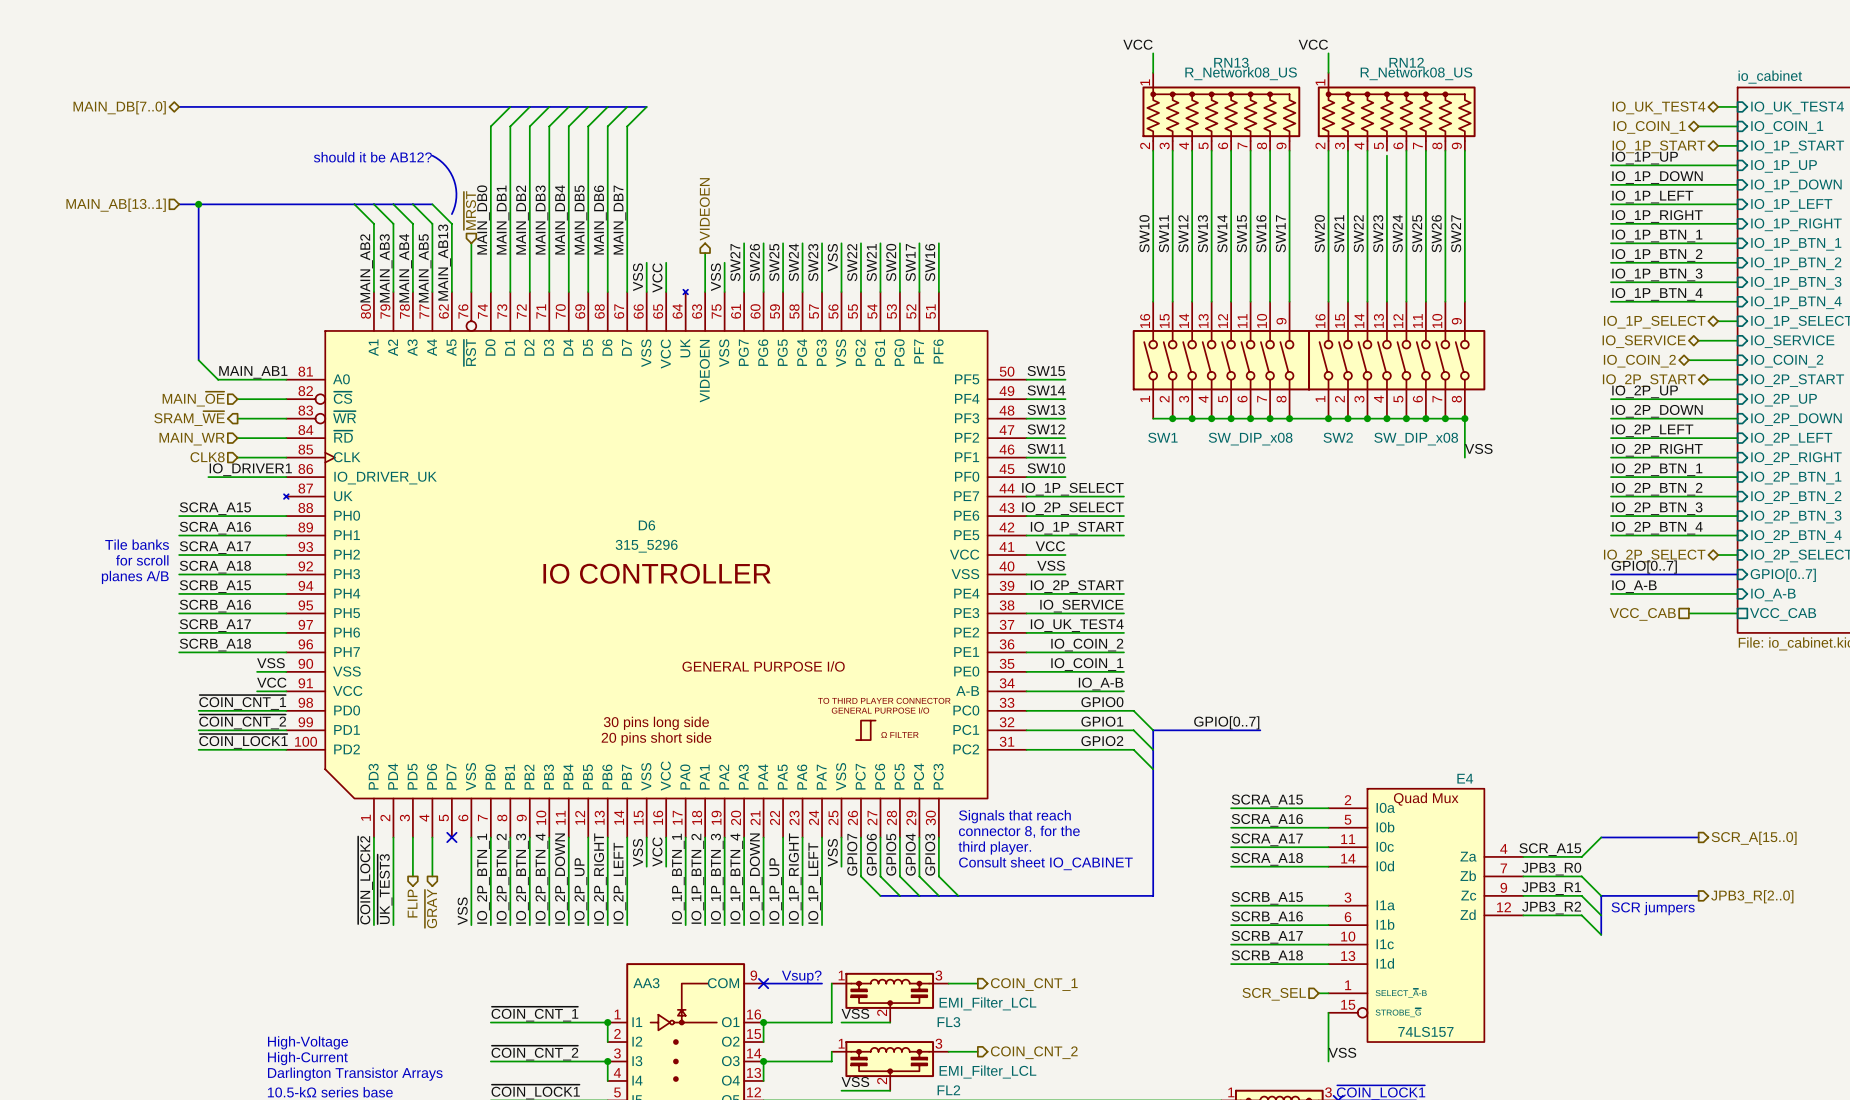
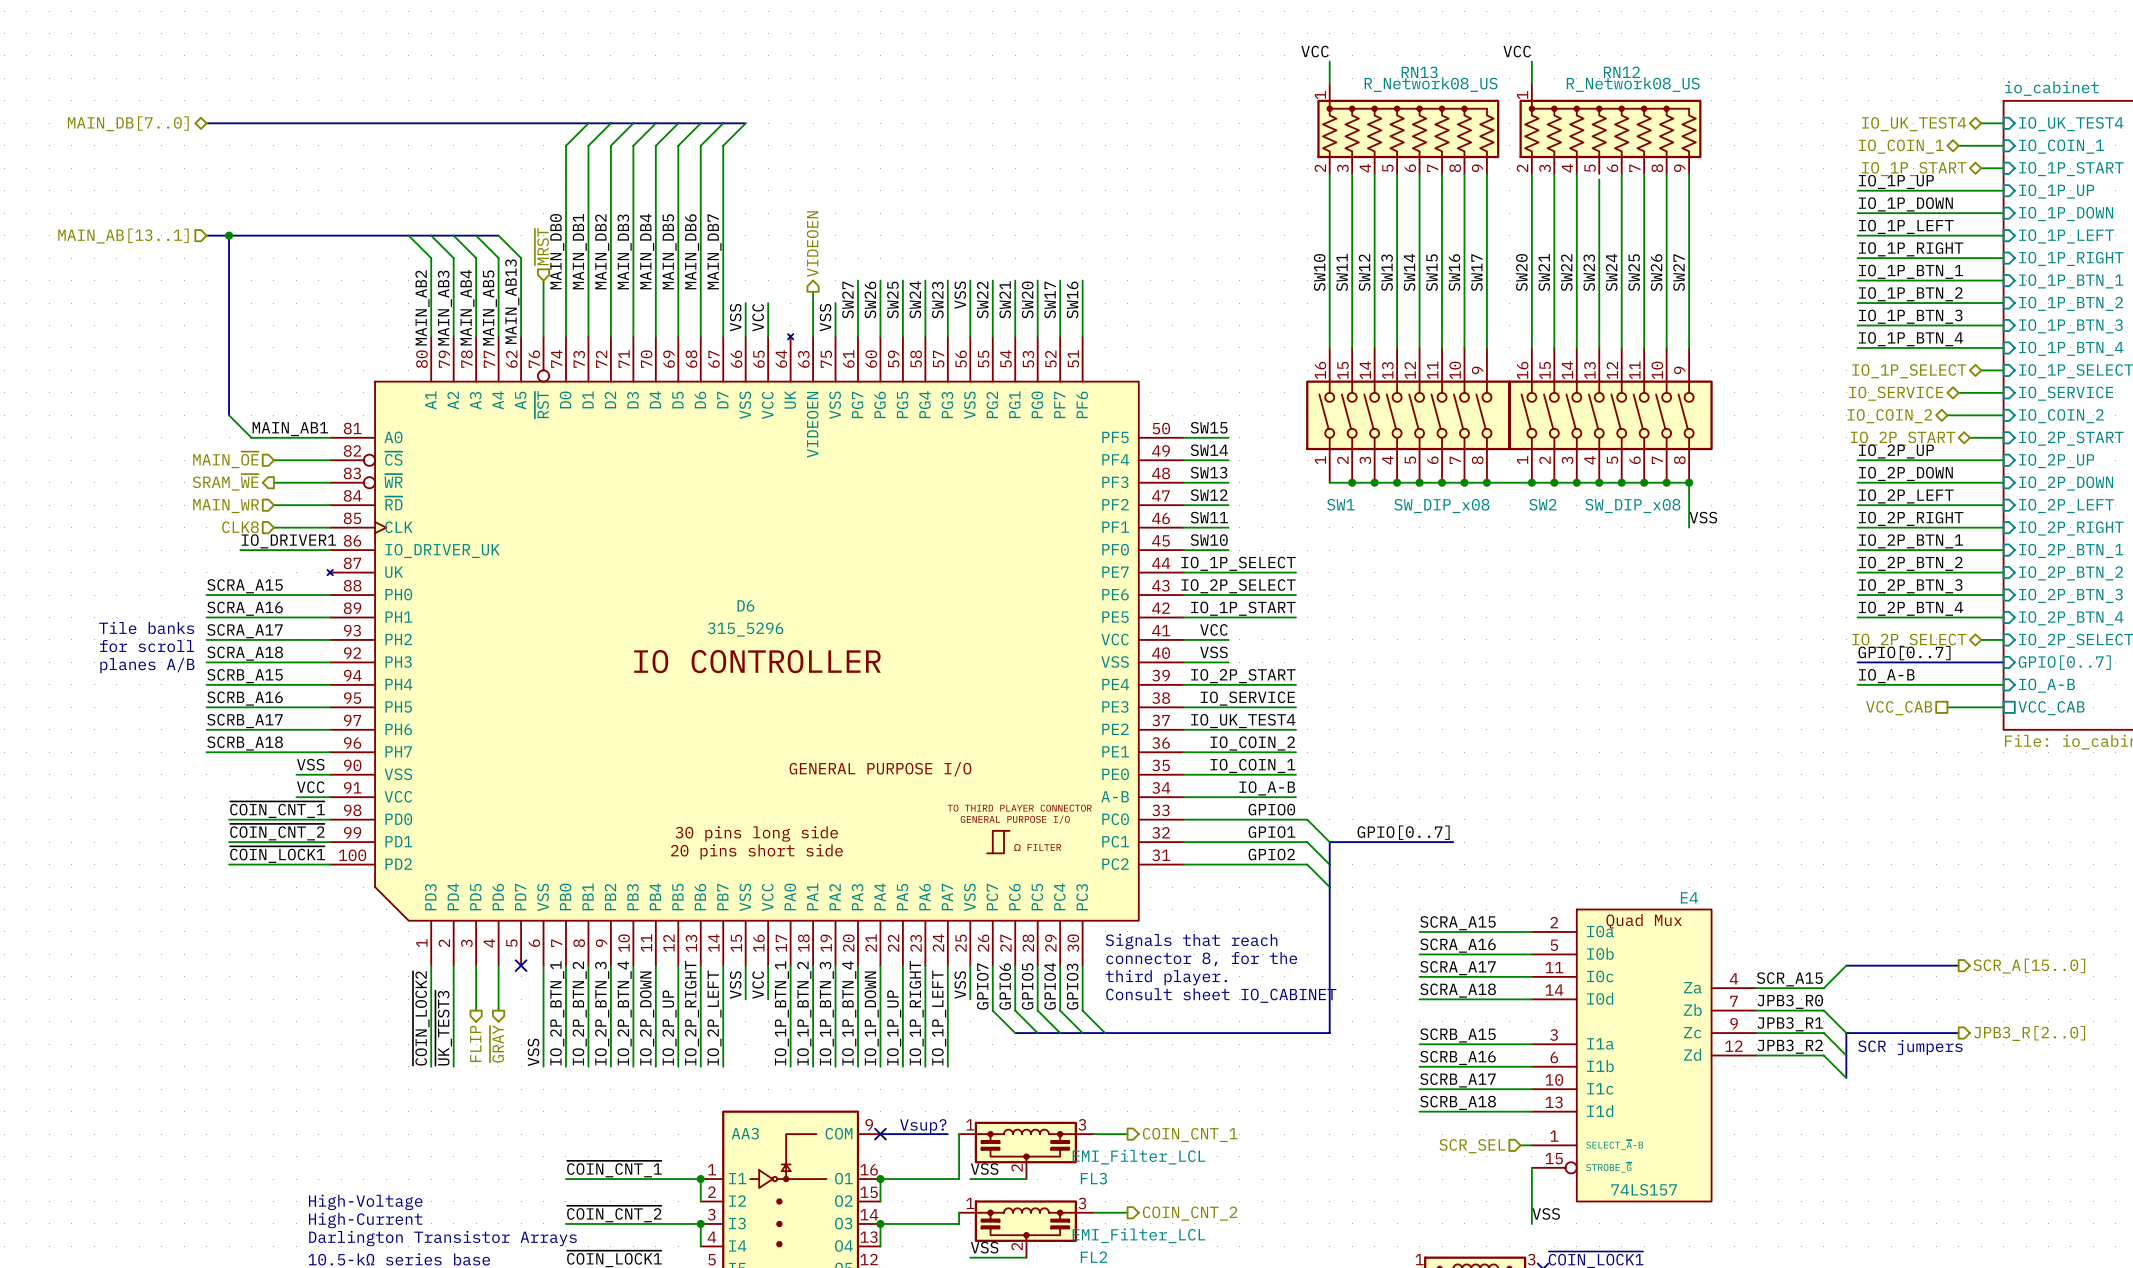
line: (432, 155) (445, 166) (454, 180) (456, 197) (451, 214) -> none
text: should it be AB12? (372, 157) -> none

